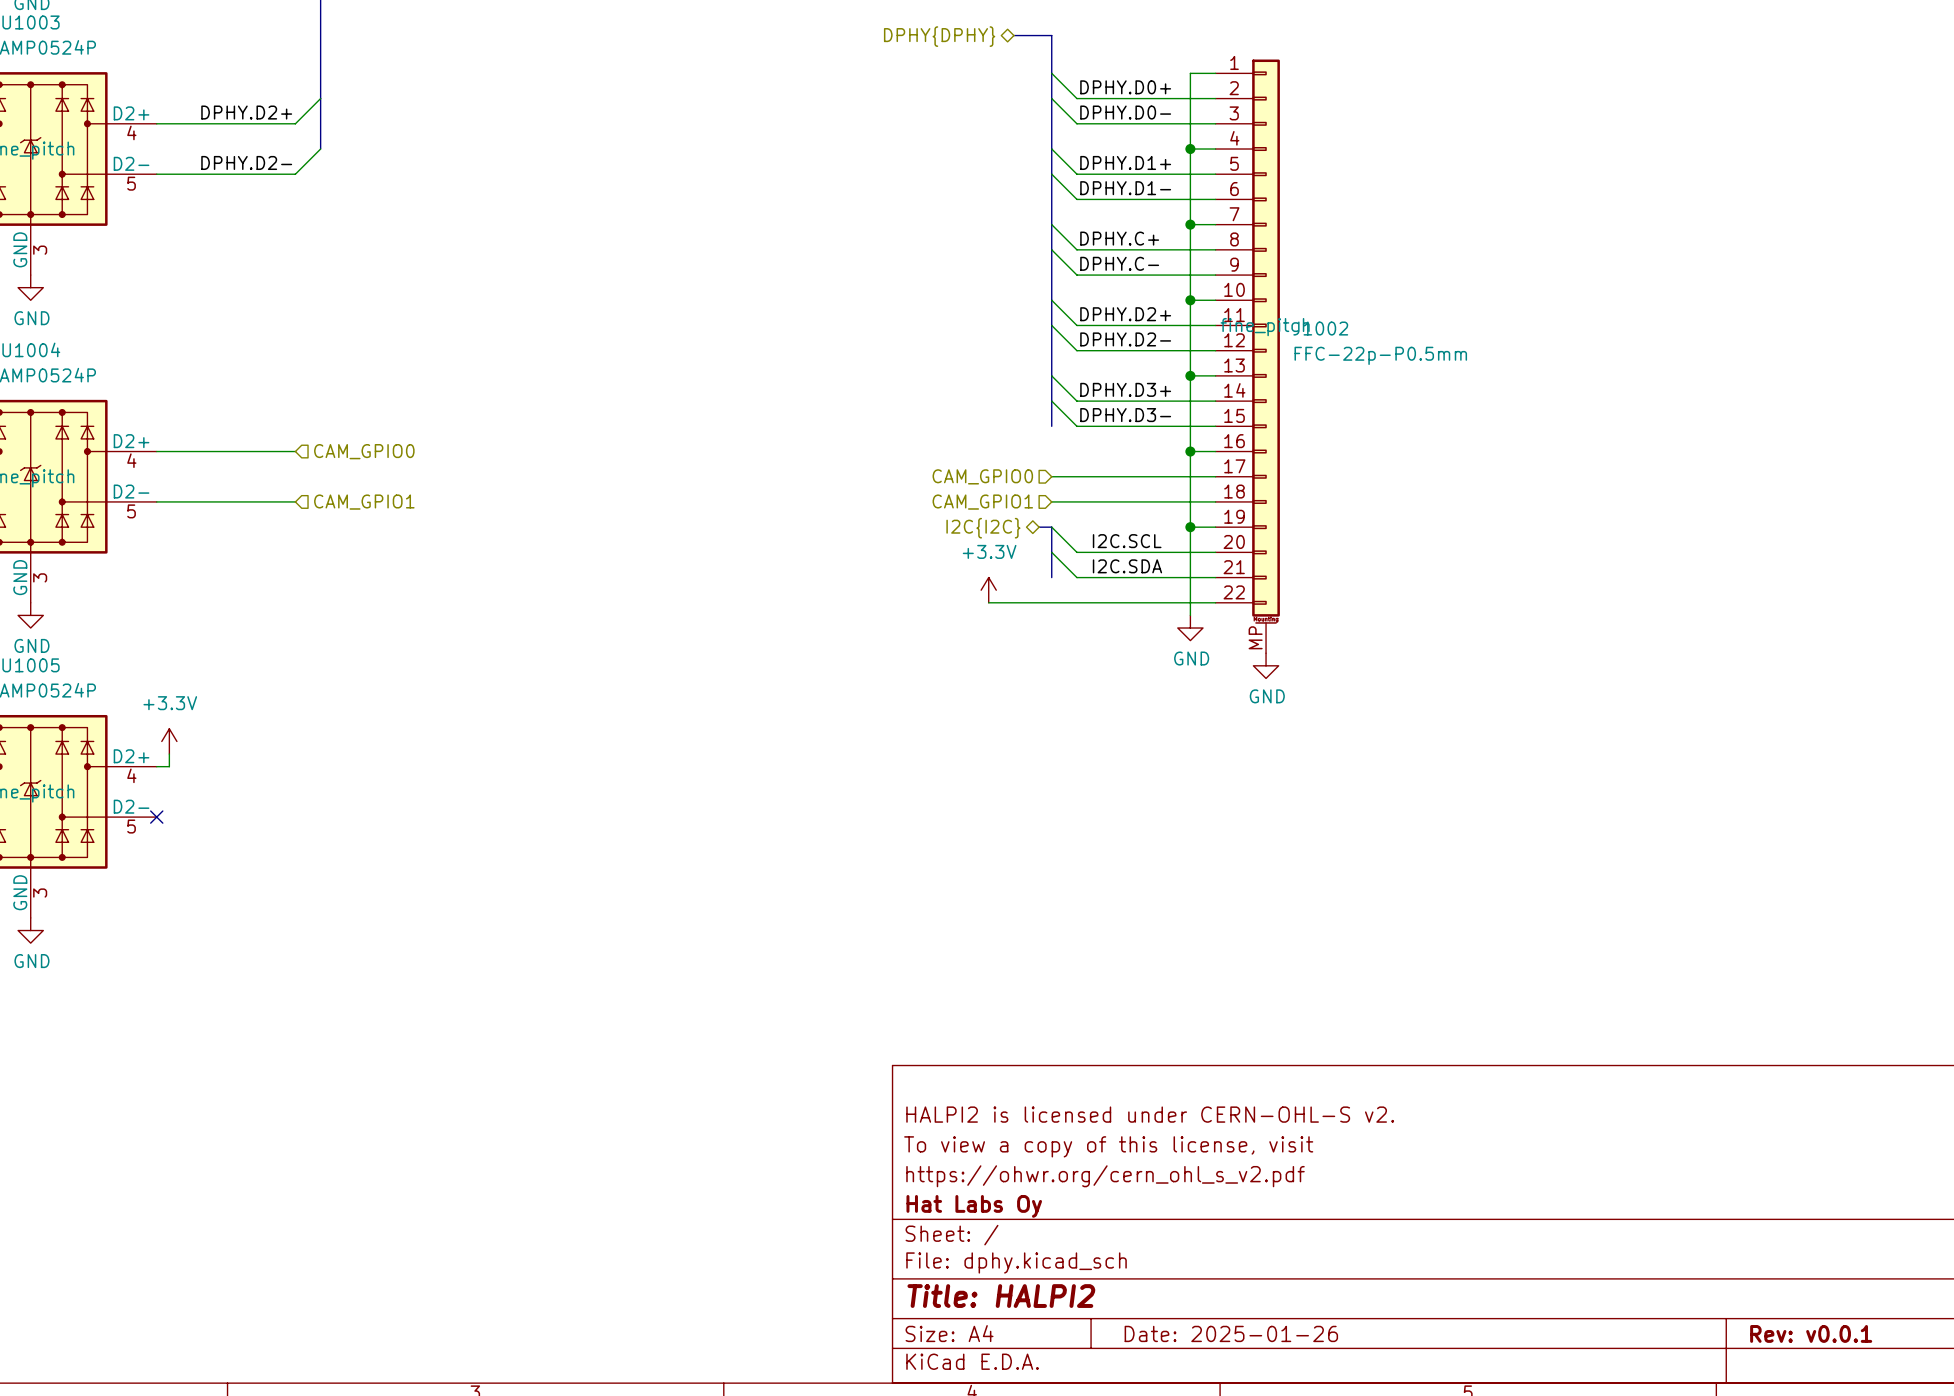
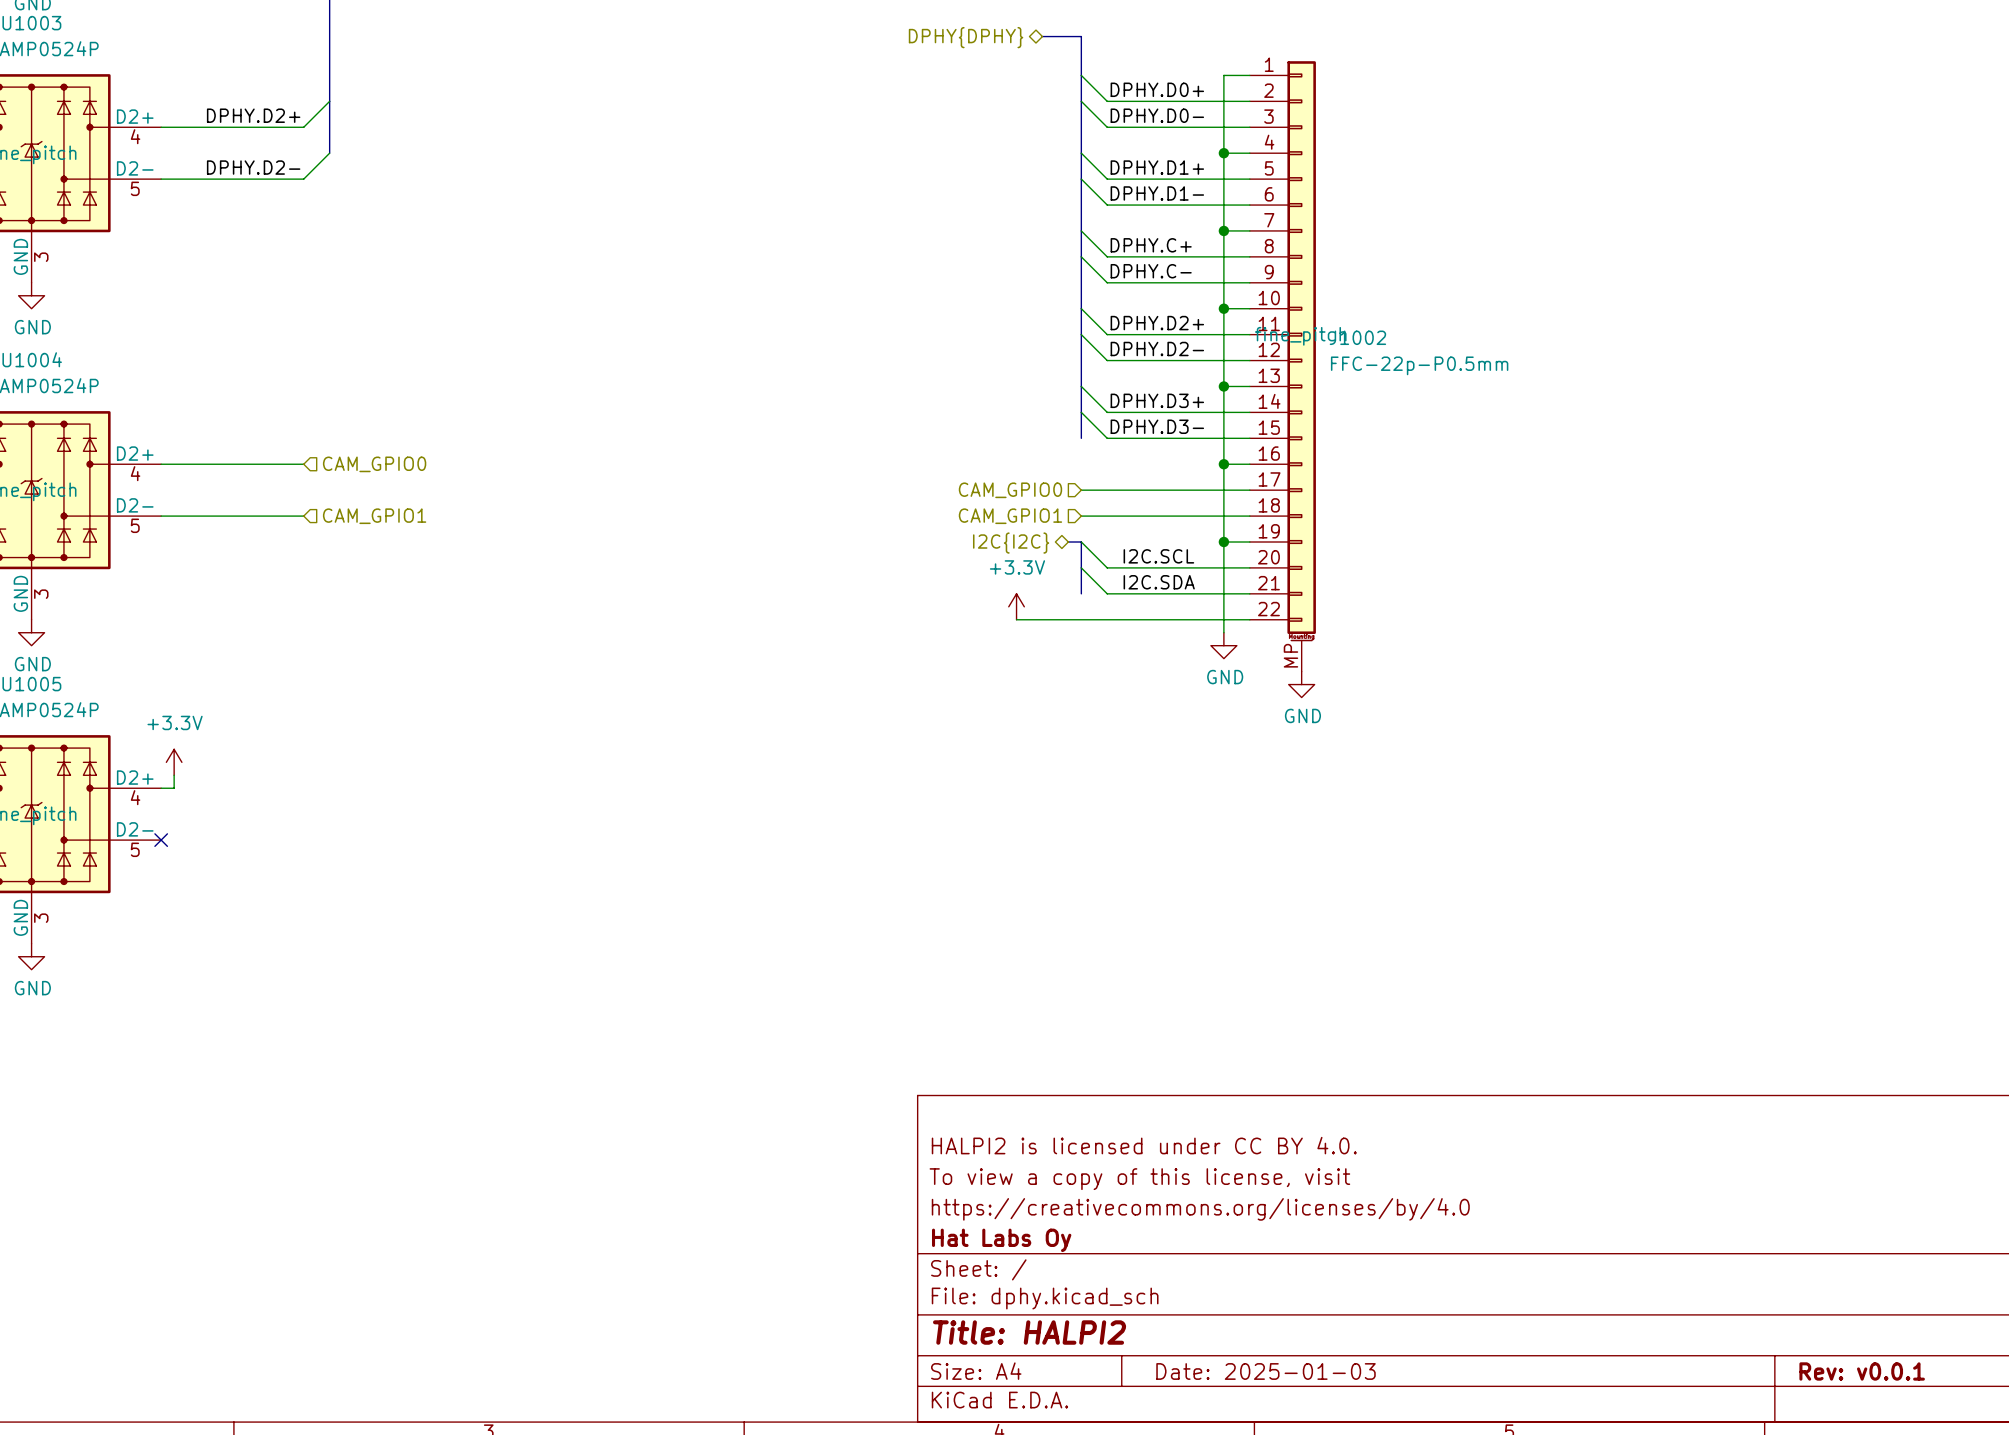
title block: HALPI2 is licensed under CERN-OHL-S v2. (1150, 1114) -> HALPI2 is licensed under CC BY 4.0. (1144, 1145)
title block: https://ohwr.org/cern_ohl_s_v2.pdf (1105, 1176) -> https://creativecommons.org/licenses/by/4.0 (1200, 1209)
title block: Date: 2025-01-26 (1231, 1333) -> Date: 2025-01-03 (1266, 1371)

